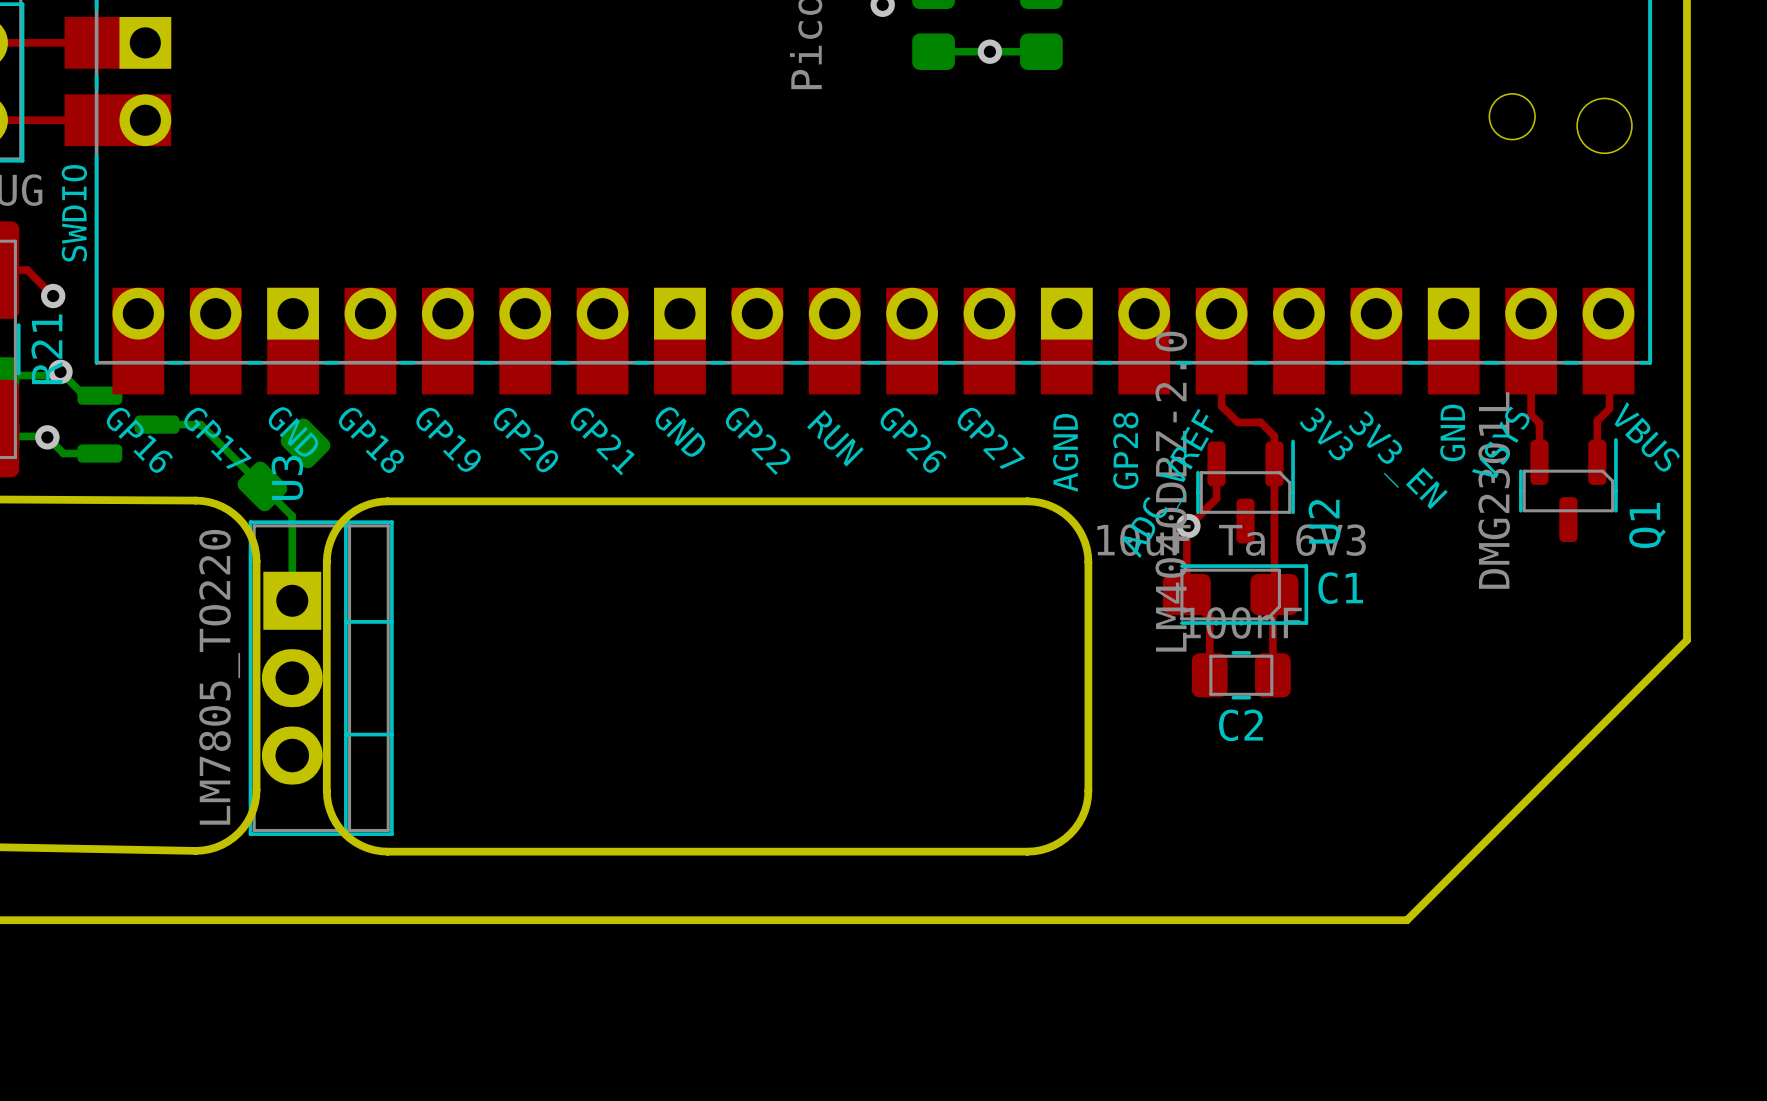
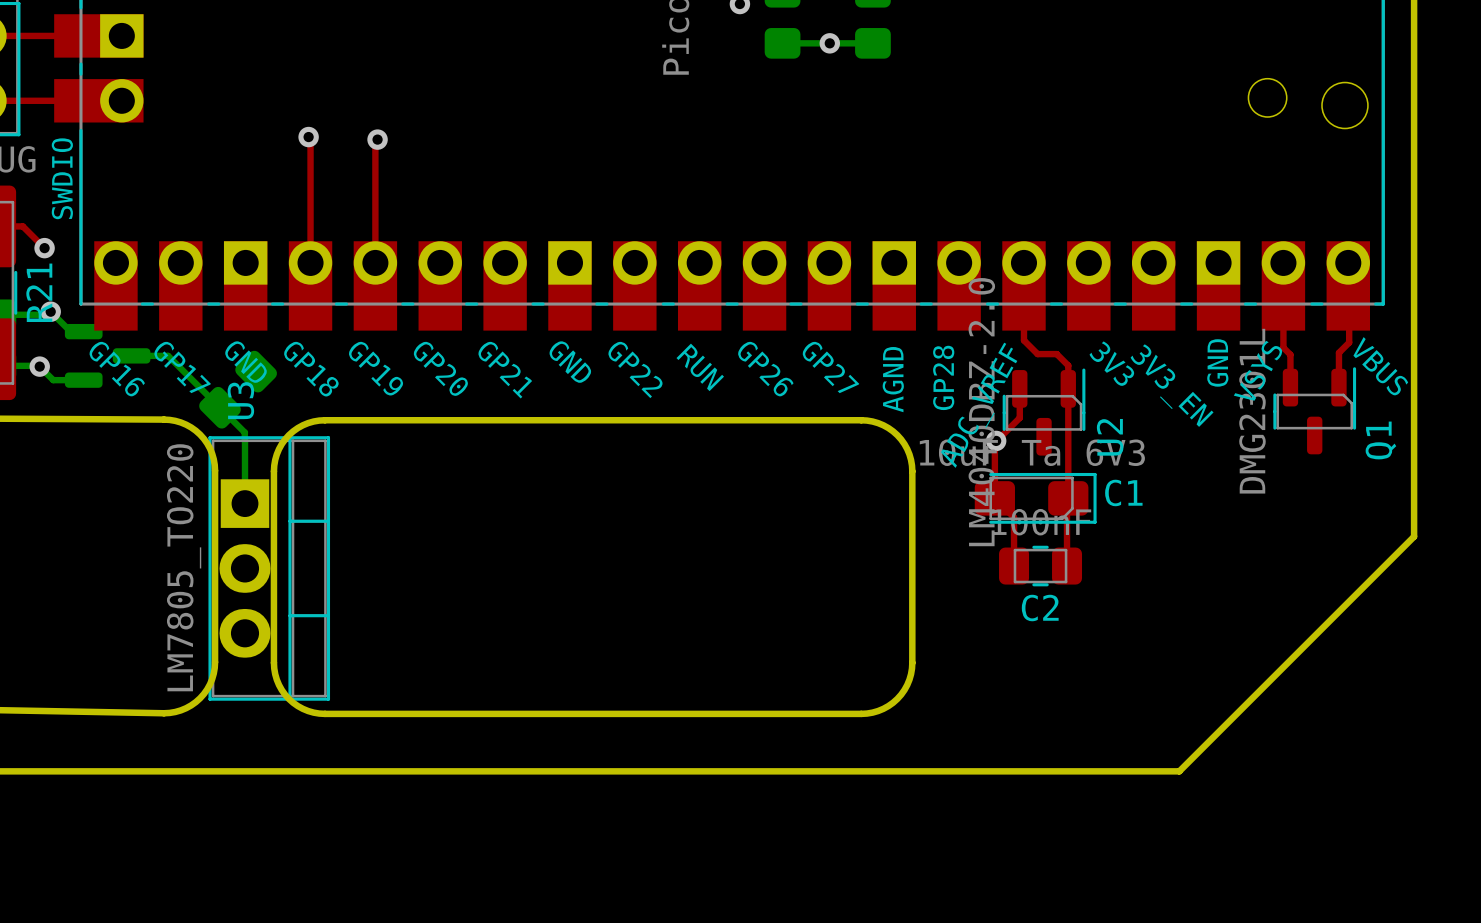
top track: none -> (308, 137) (310, 138) (310, 262)
via: none -> (308, 137)
top track: none -> (377, 139) (375, 141) (375, 262)
via: none -> (377, 139)

